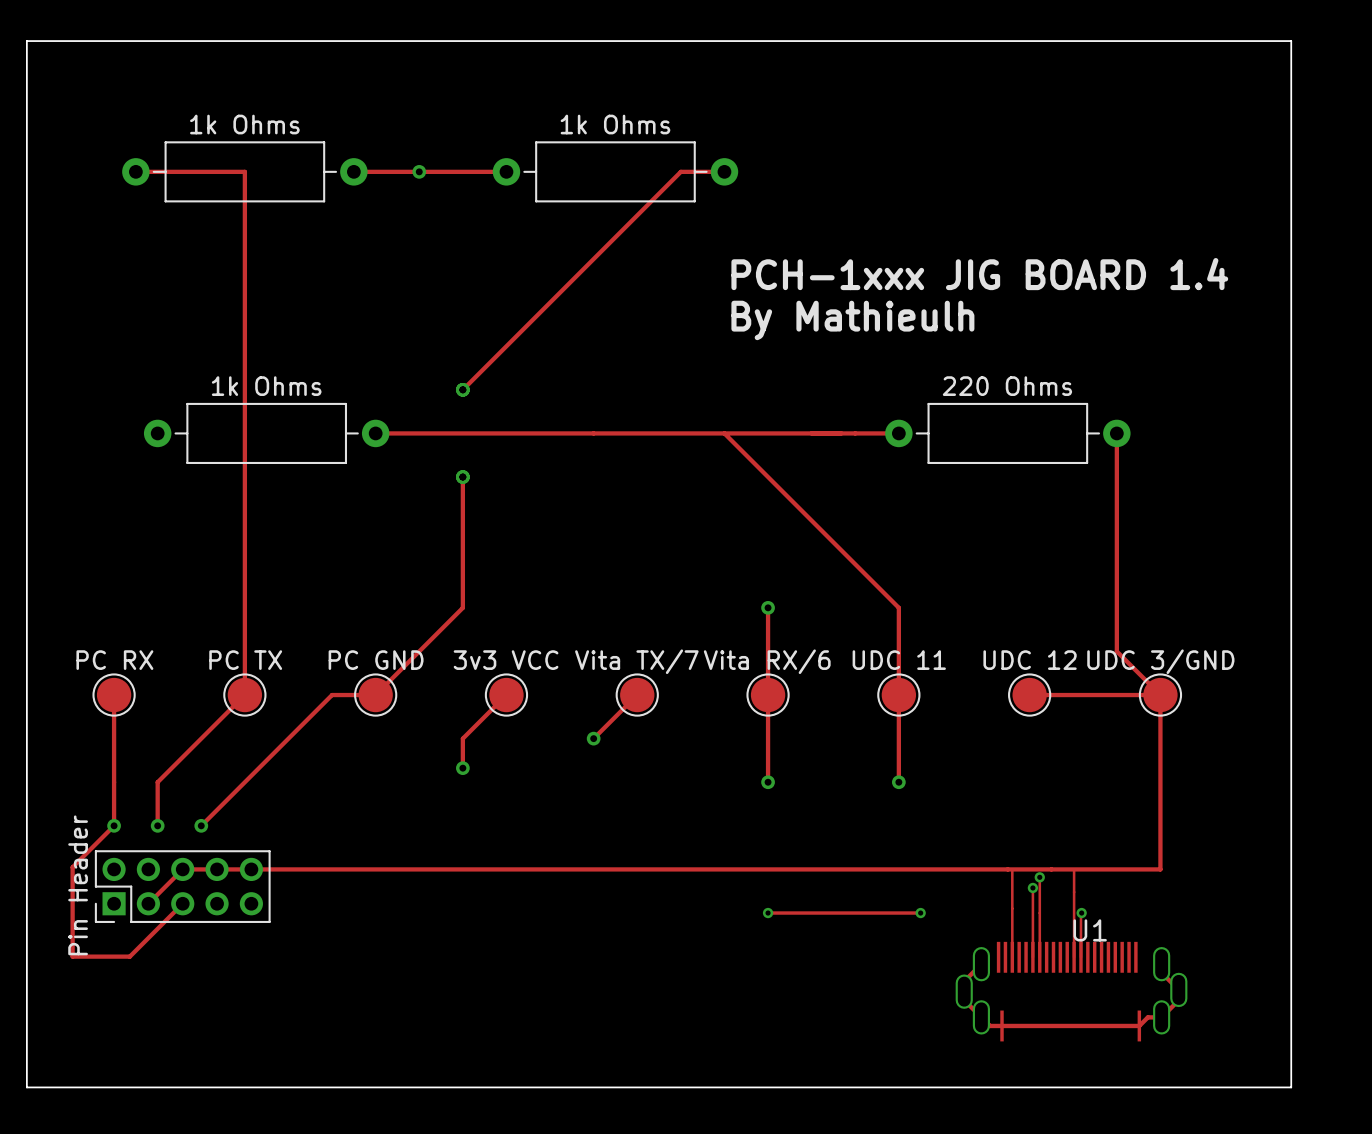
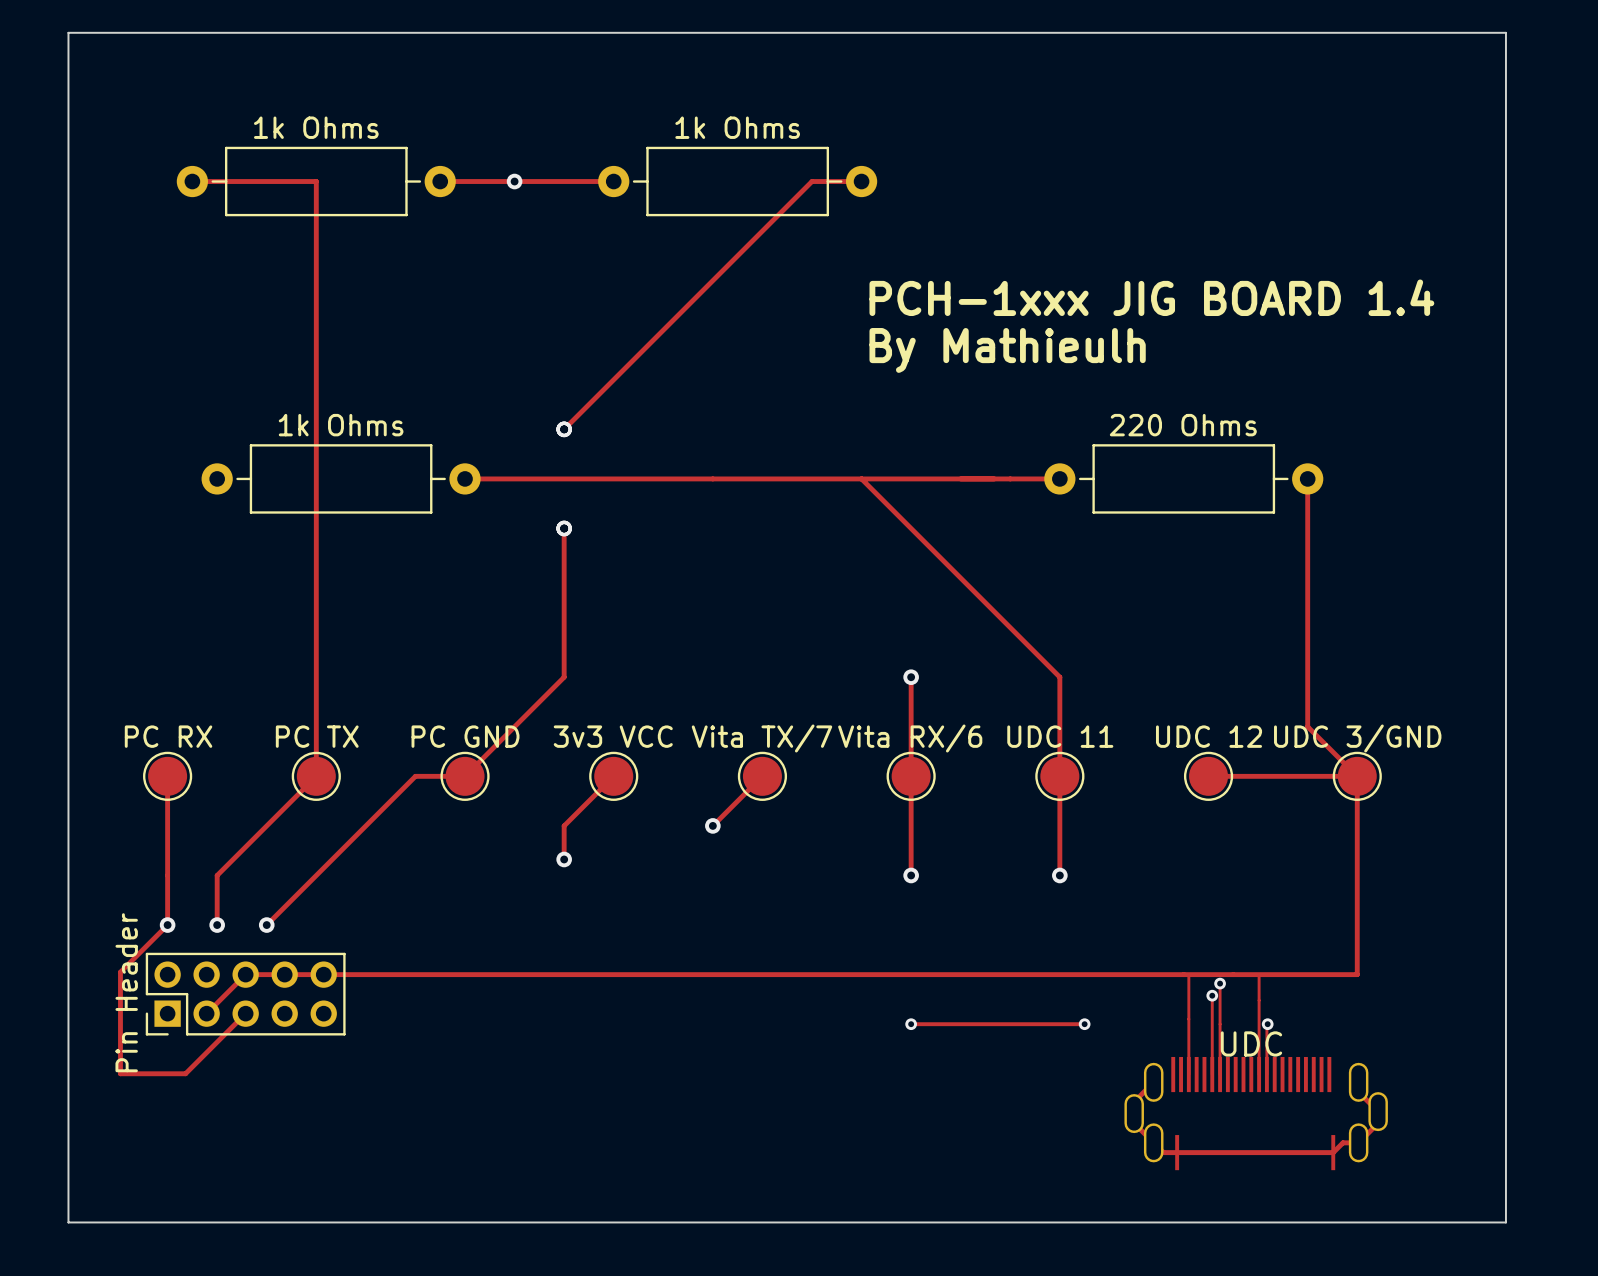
U1 name: U1 (1090, 930) -> UDC (1251, 1043)

